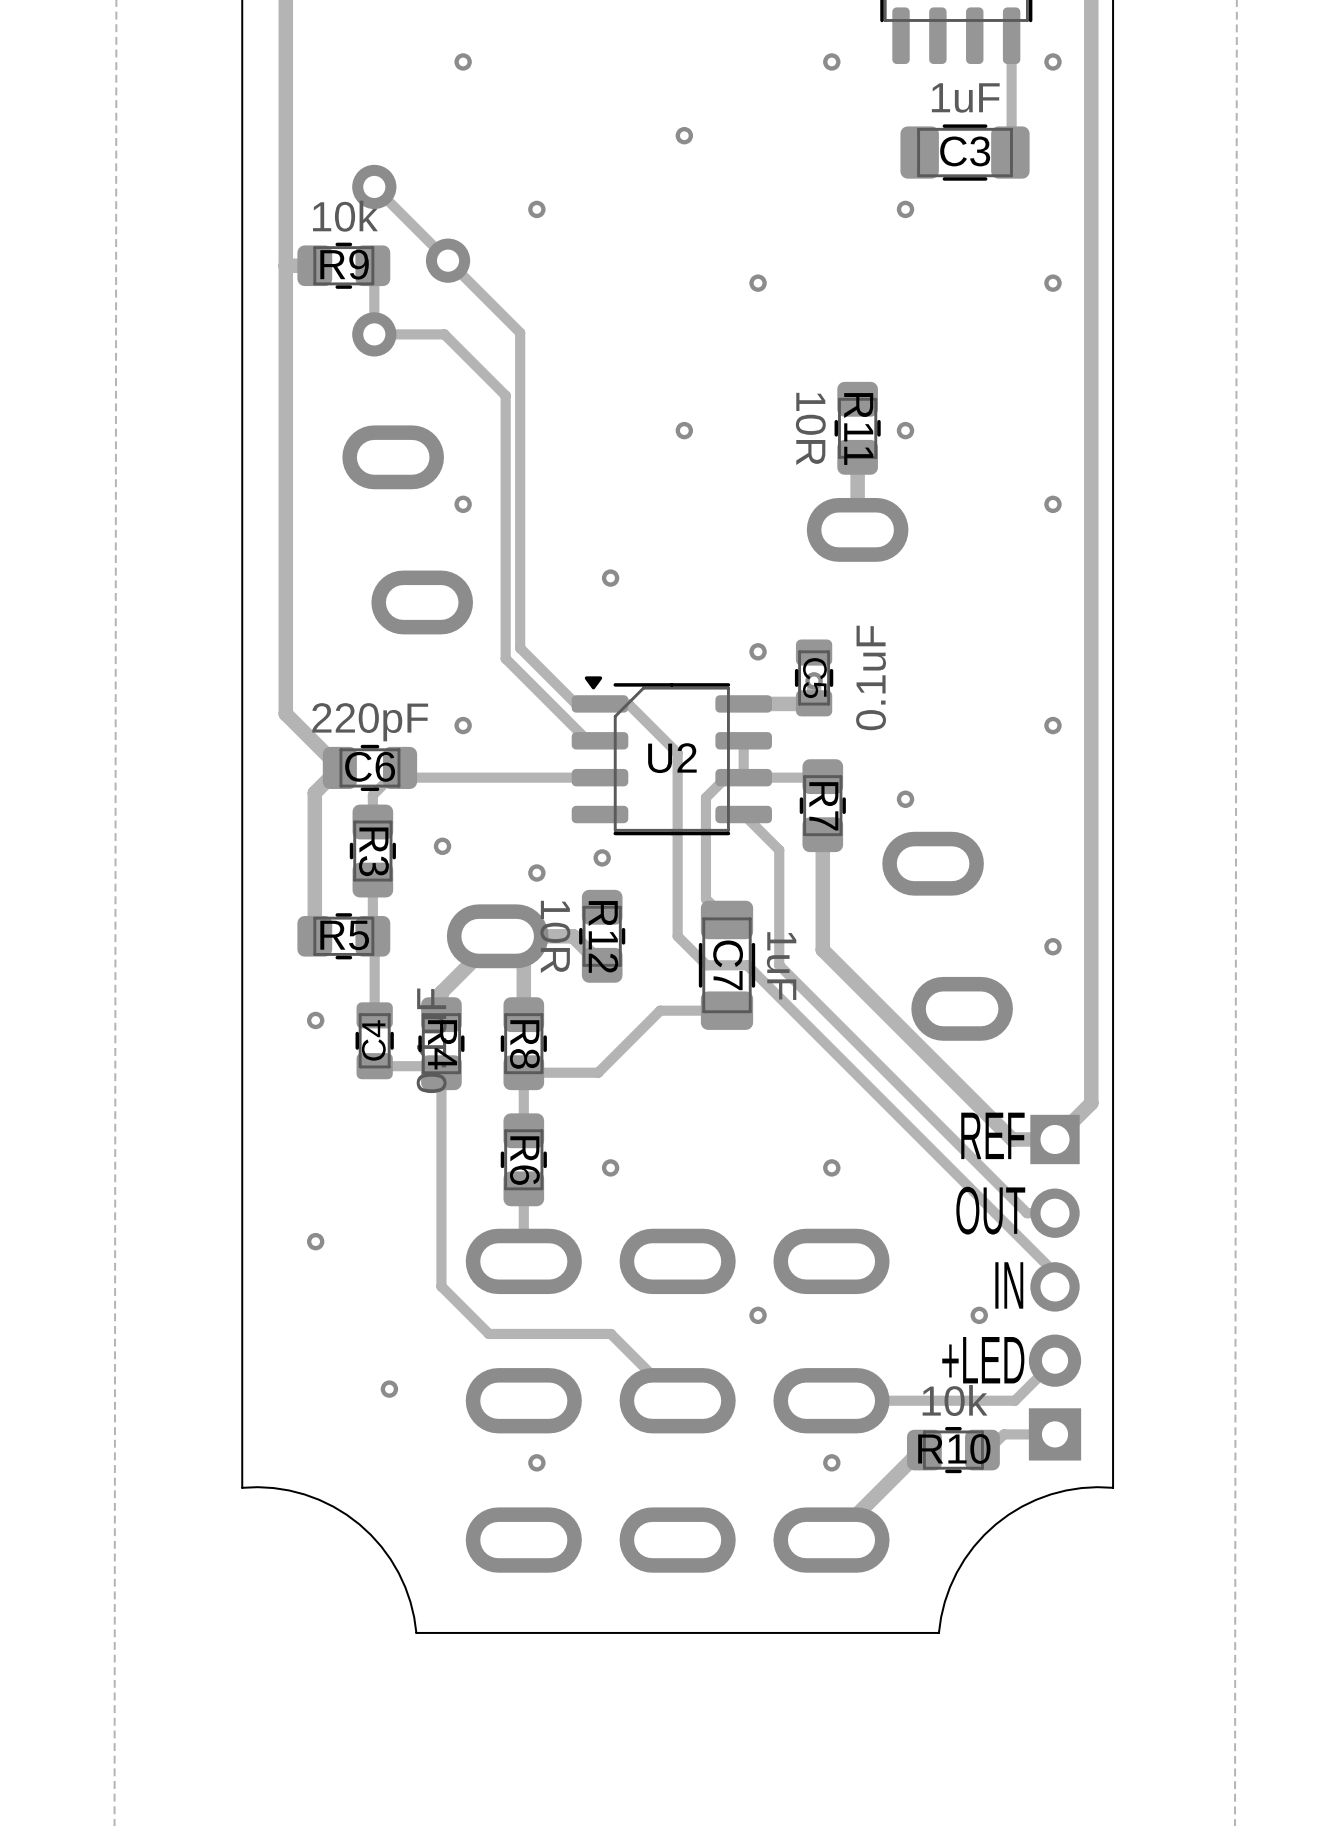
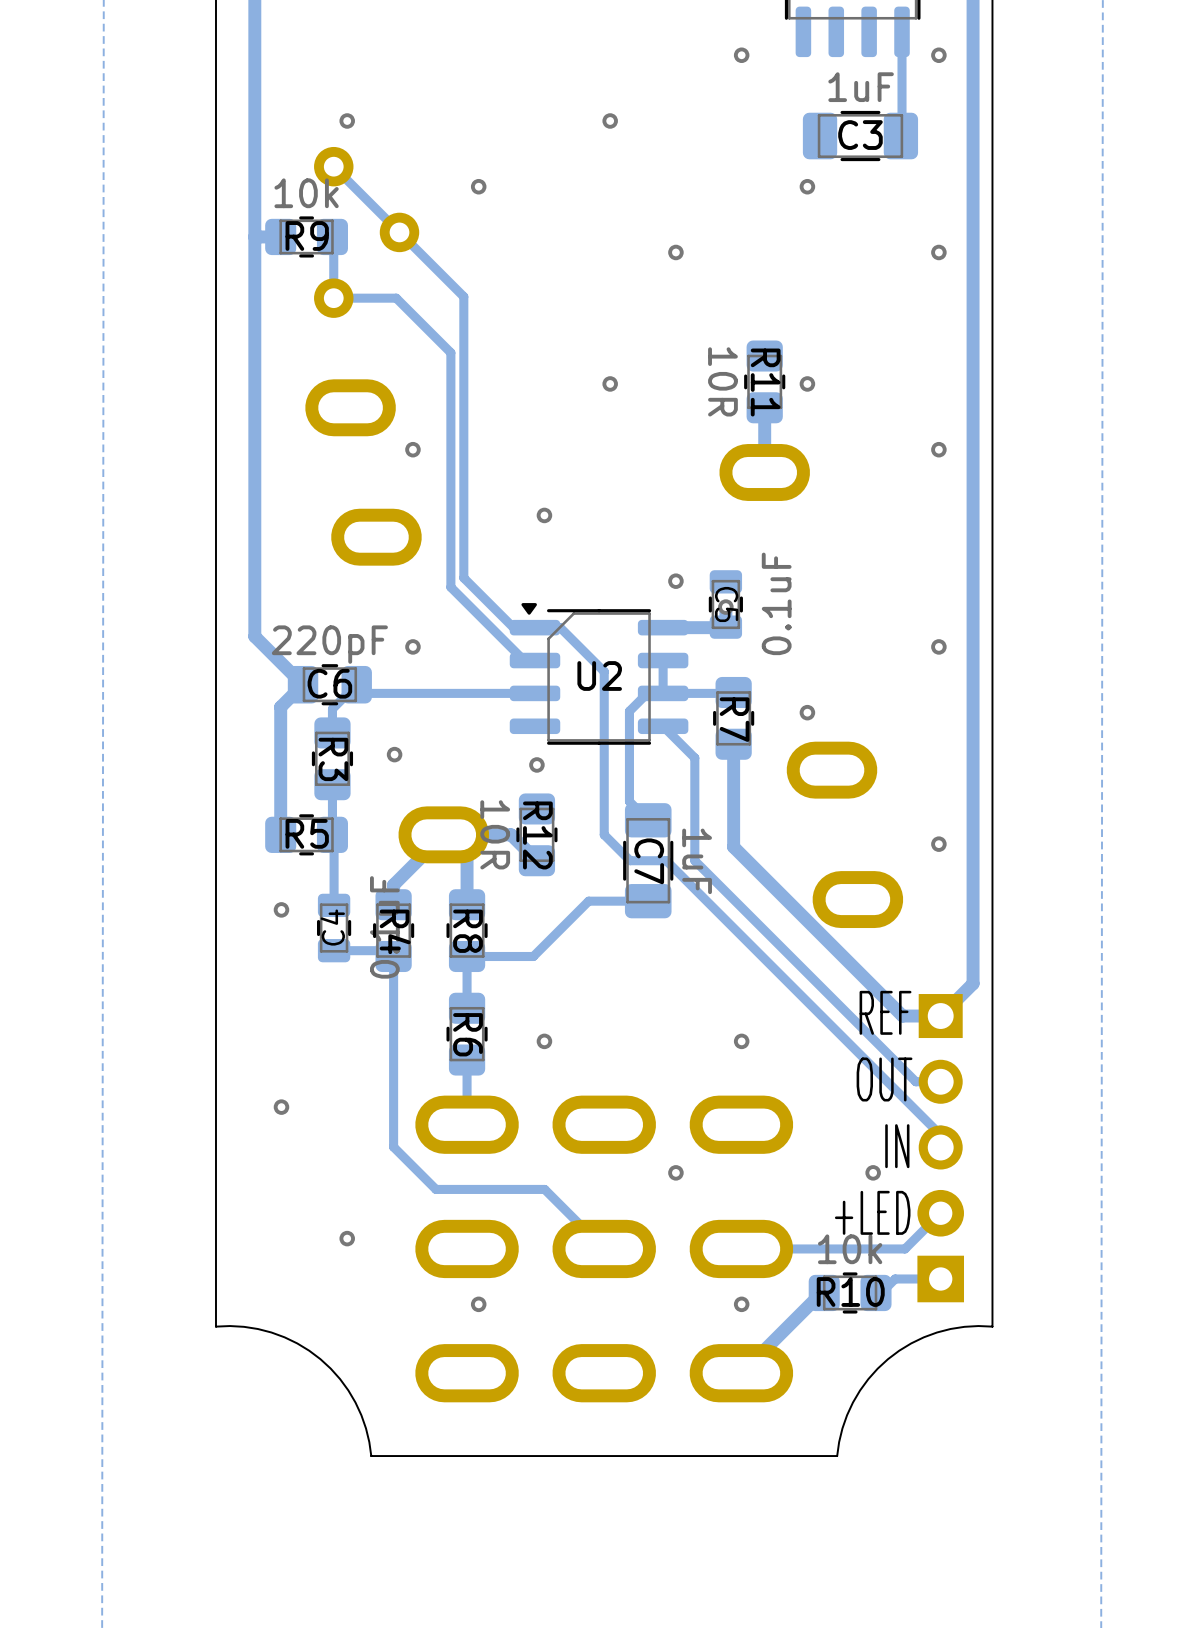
via: (463, 61) -> none
via: none -> (347, 120)
via: (536, 872) -> none

